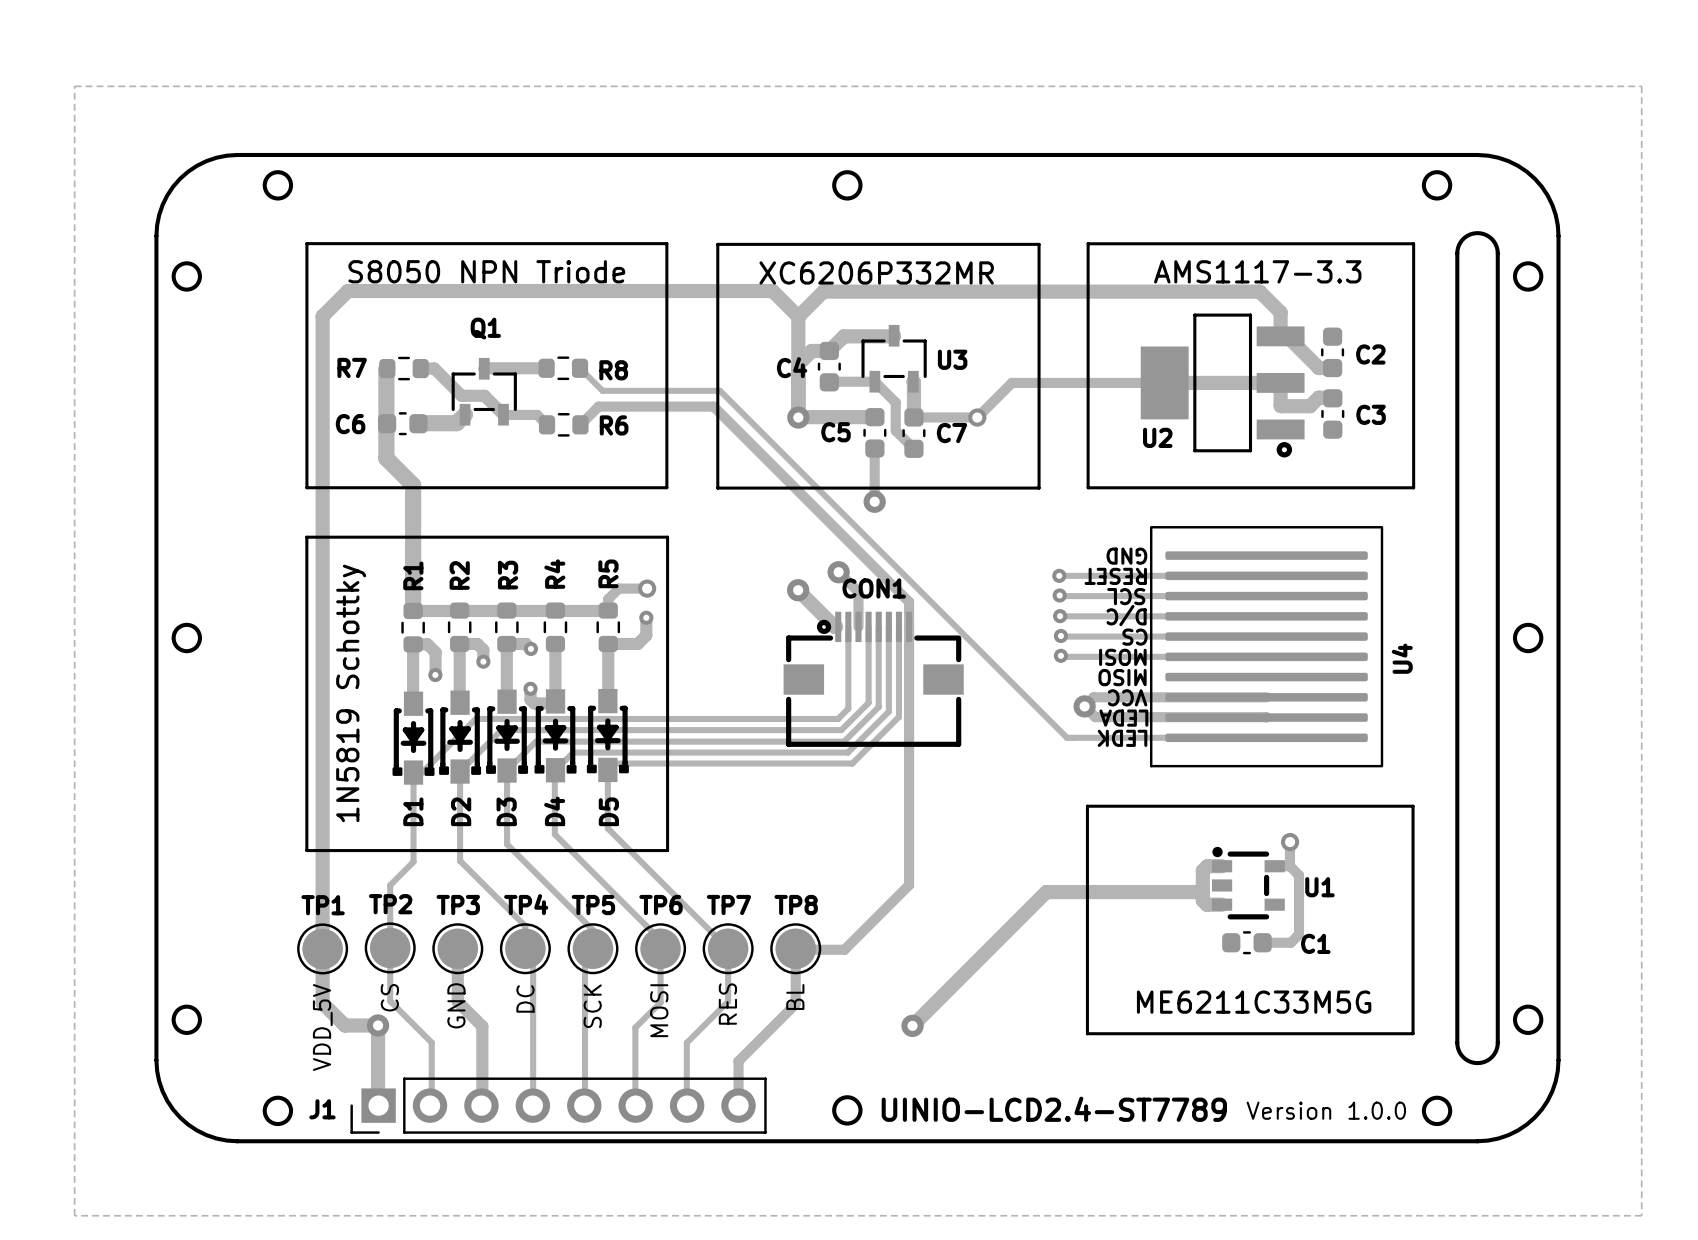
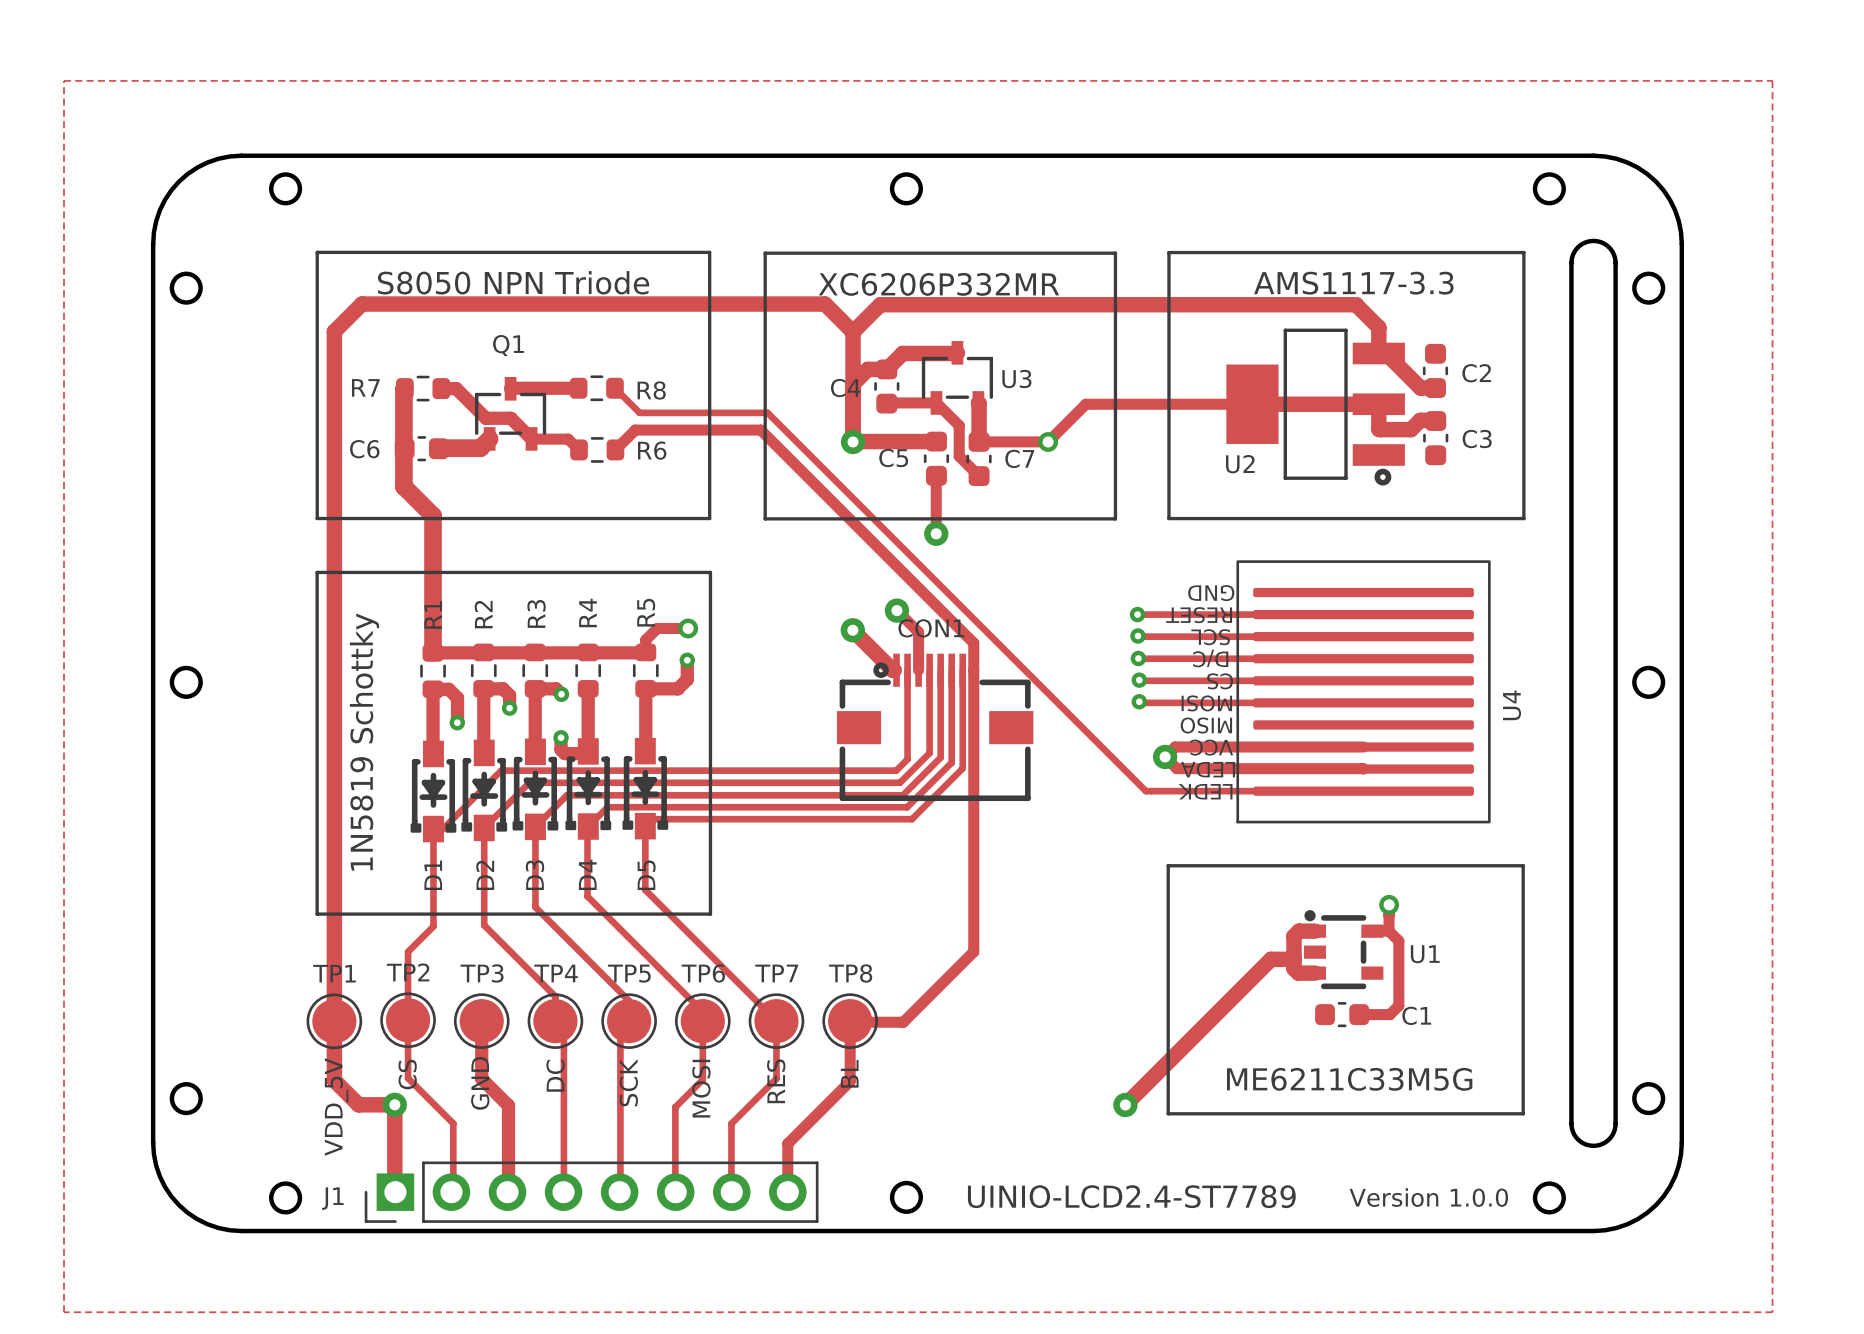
track: (1181, 892) (1046, 892) (912, 1025) -> (1271, 959) (1125, 1105)
via: (912, 1025) -> none
via: none -> (1125, 1105)

